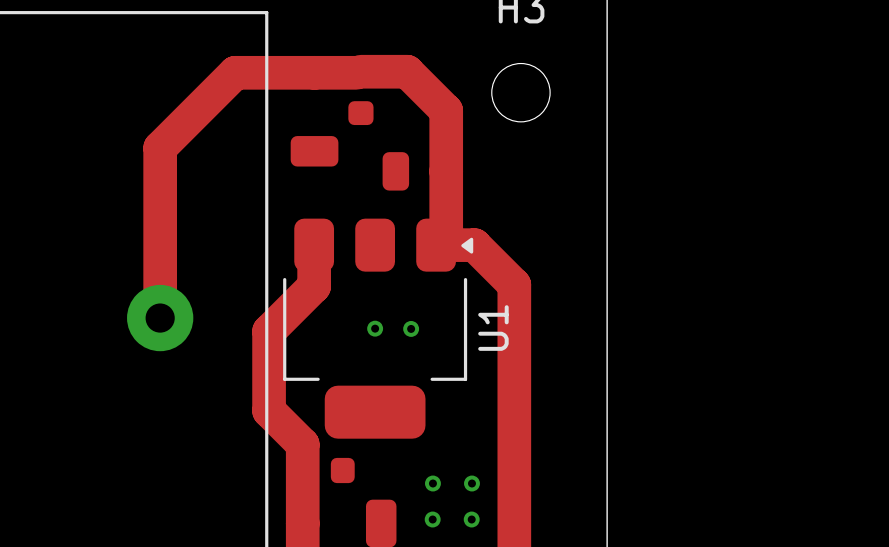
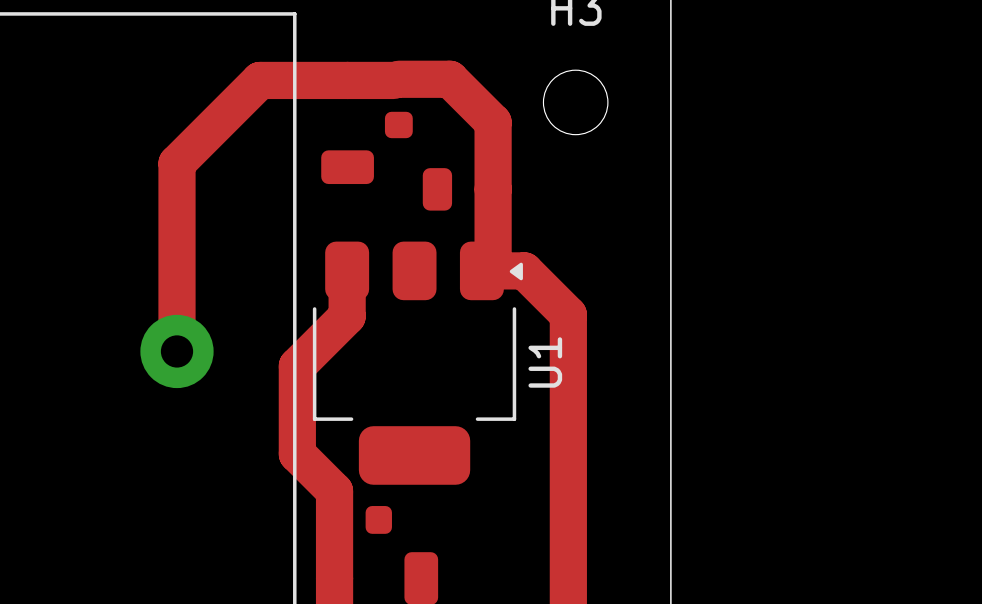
via: (375, 328) -> none
via: (411, 328) -> none
via: (432, 483) -> none
via: (471, 483) -> none
via: (432, 519) -> none
via: (471, 519) -> none

